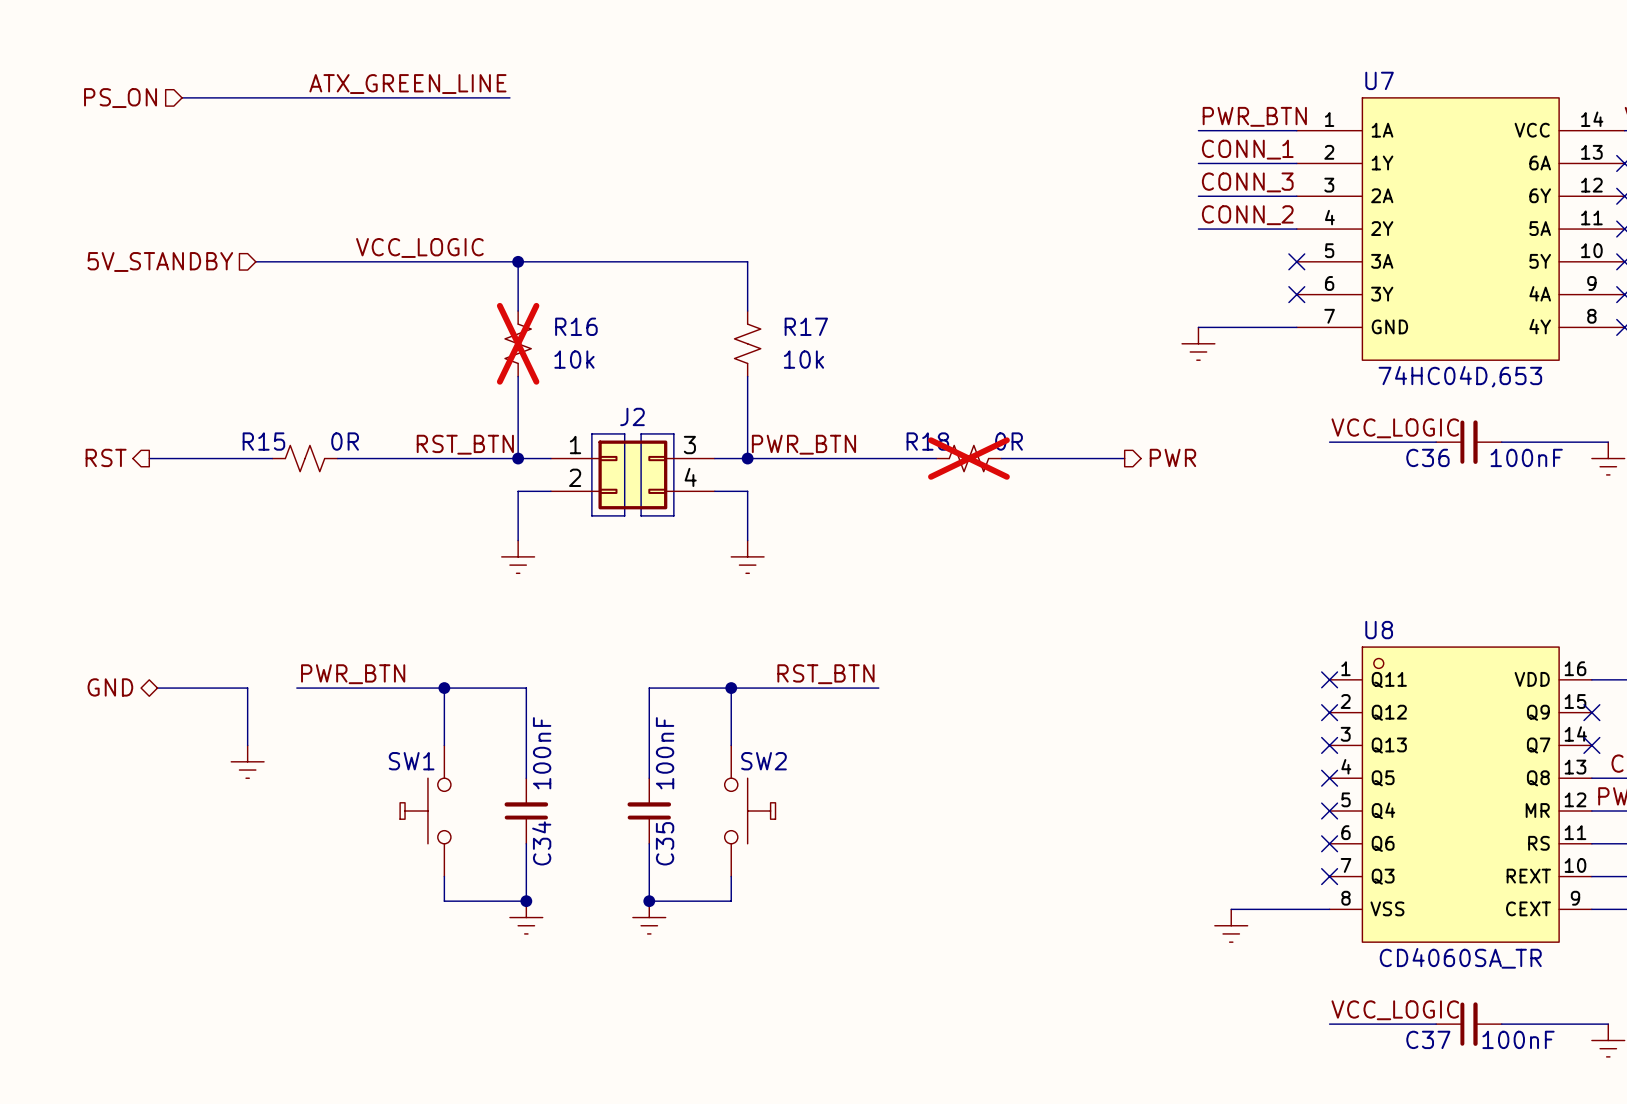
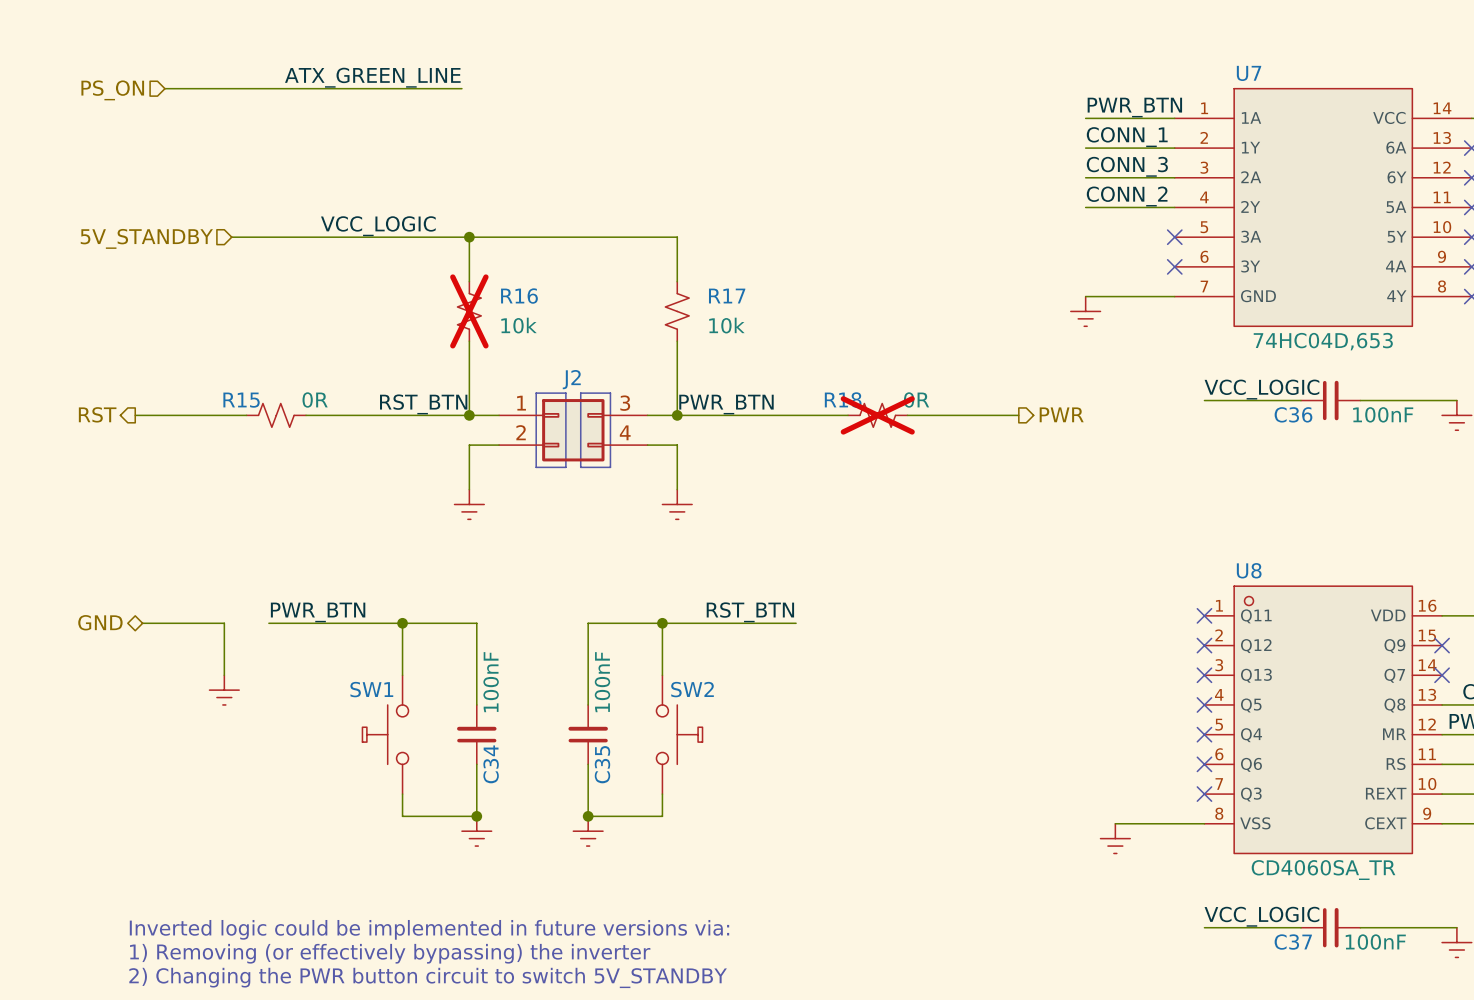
text: none -> Inverted logic could be implemented in future versions via: (429, 929)
text: none -> 1) Removing (or effectively bypassing) the inverter (390, 953)
text: none -> 2) Changing the PWR button circuit to switch 5V_STANDBY (428, 977)

